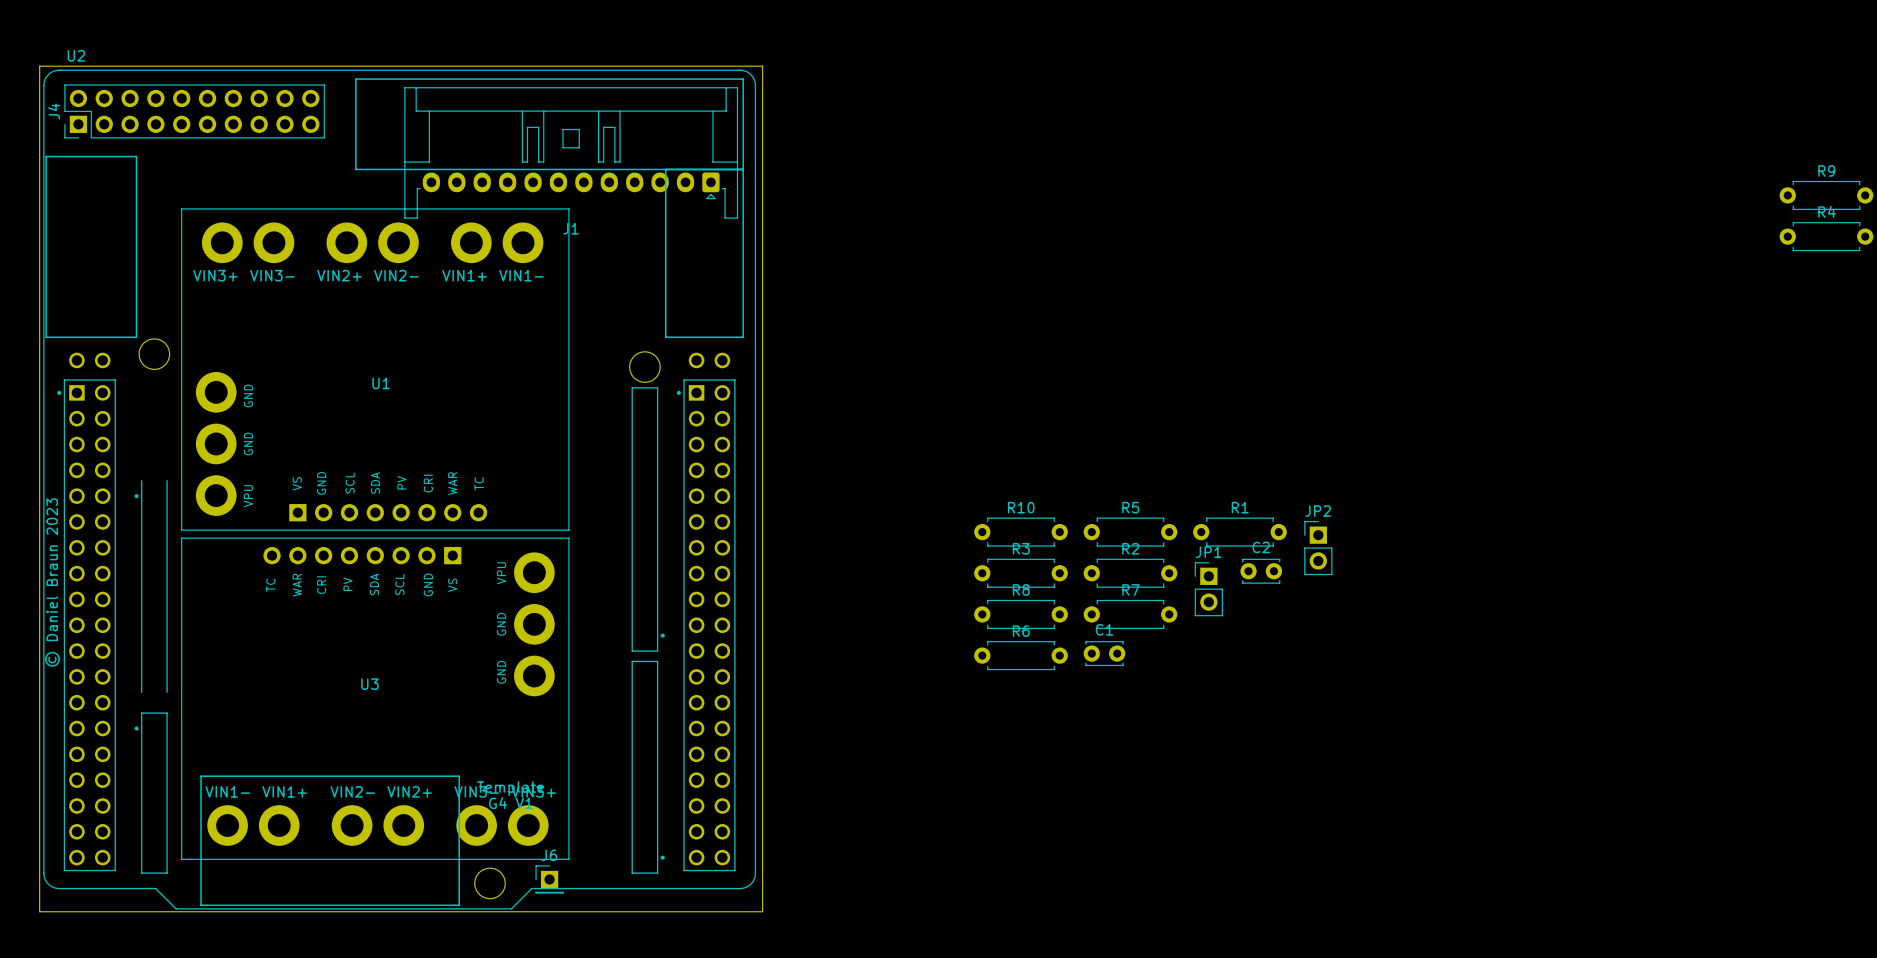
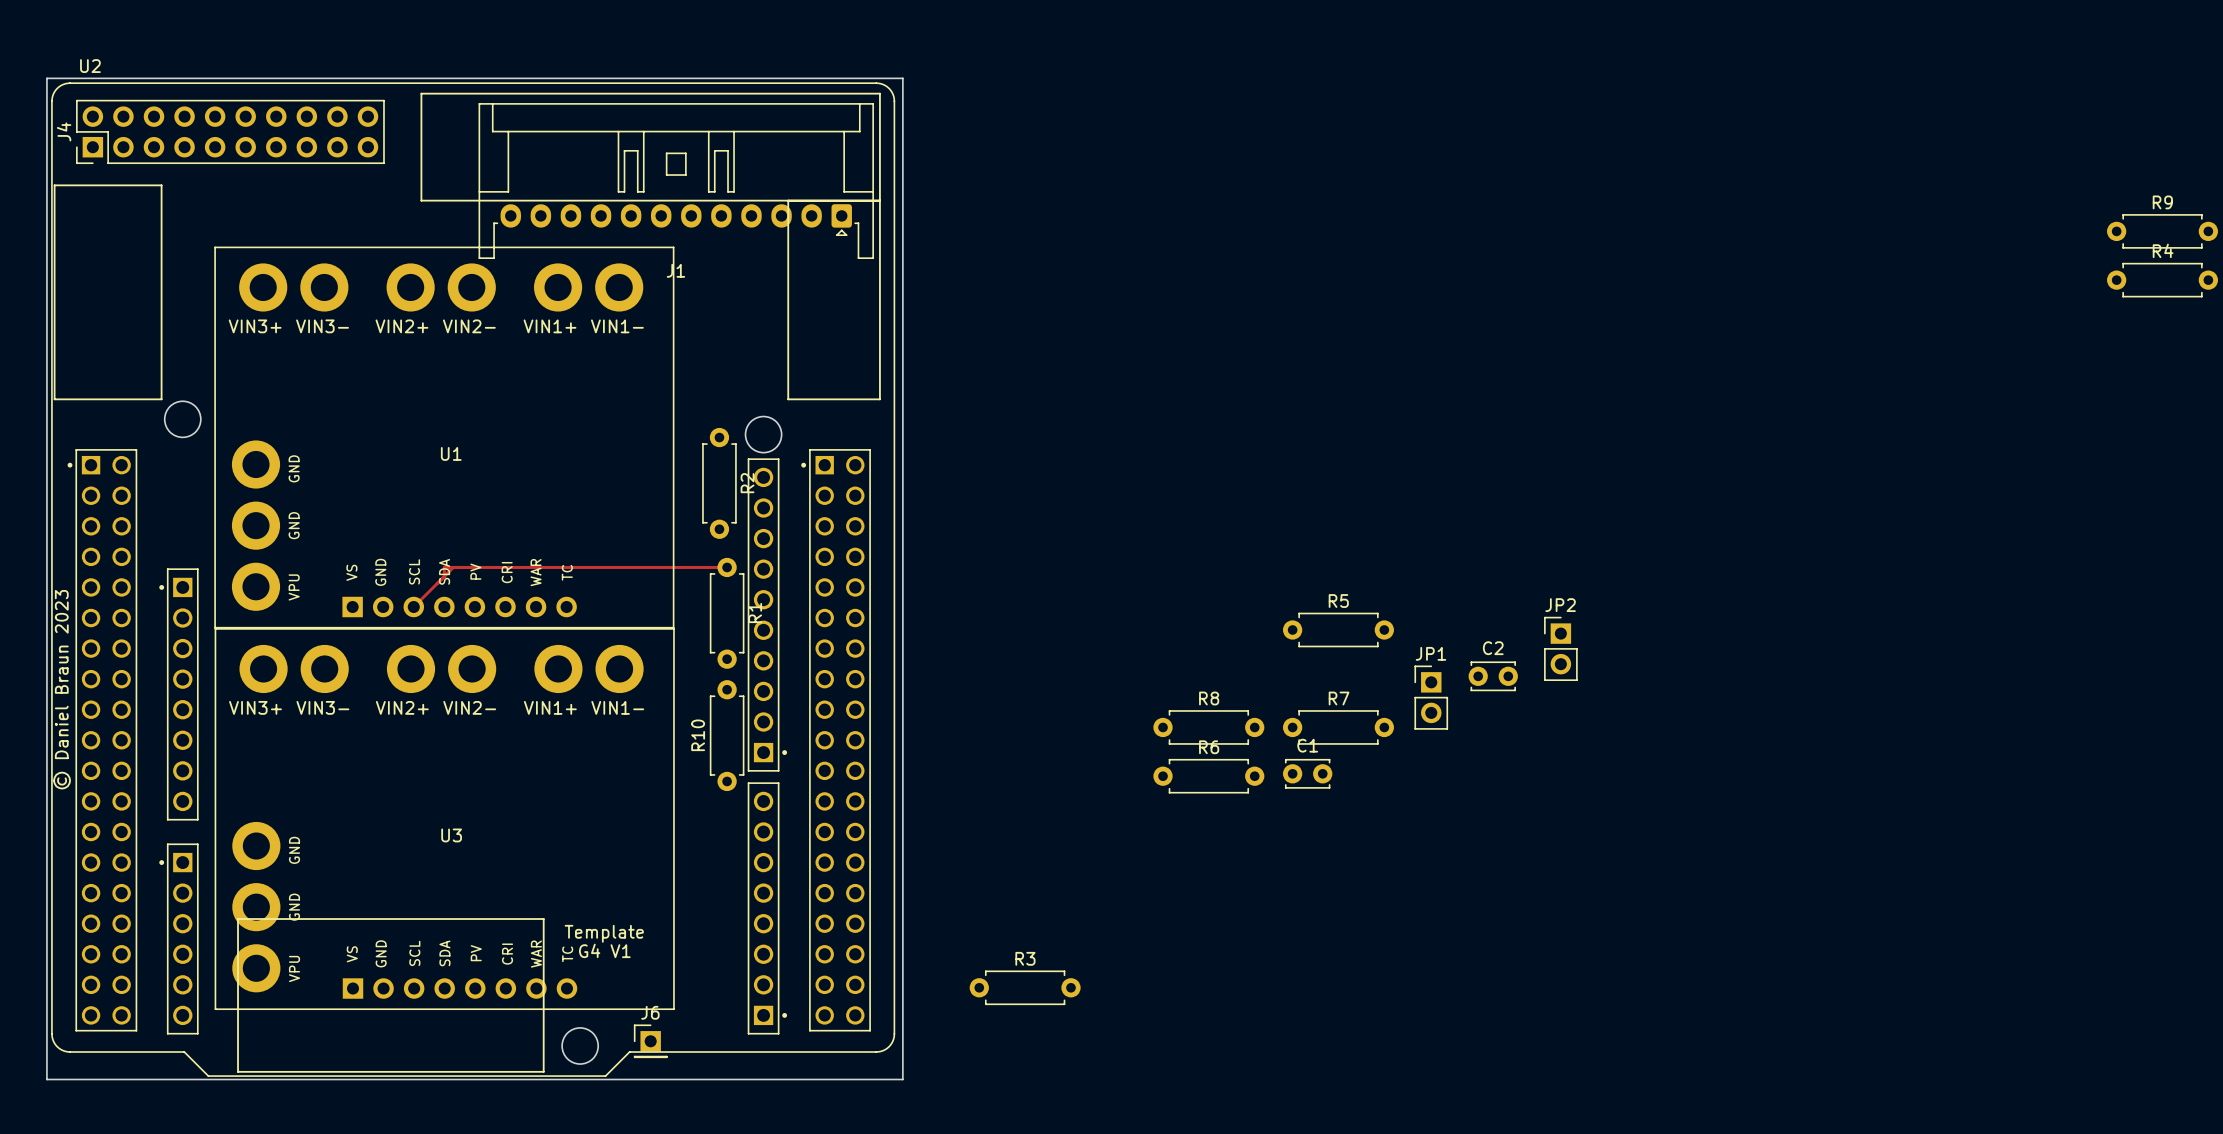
U2 footprint: [43, 69, 757, 910] -> [51, 82, 896, 1077]
top track: none -> (453, 567) (413, 607)
top track: none -> (727, 567) (444, 567) (444, 576)
R10 name position: R10 (1021, 507) -> R10 (698, 735)
R10 rotation: 0° (1021, 532) -> 90° clockwise (727, 735)
R10 position: (1021, 532) -> (727, 735)
R1 rotation: 0° (1239, 532) -> 90° clockwise (727, 613)
R1 position: (1239, 532) -> (727, 613)
R3 position: (1021, 573) -> (1025, 987)
R2 rotation: 0° (1130, 573) -> 90° clockwise (719, 483)
R2 position: (1130, 573) -> (719, 483)
U3 rotation: 0° (375, 698) -> 180° (444, 819)

